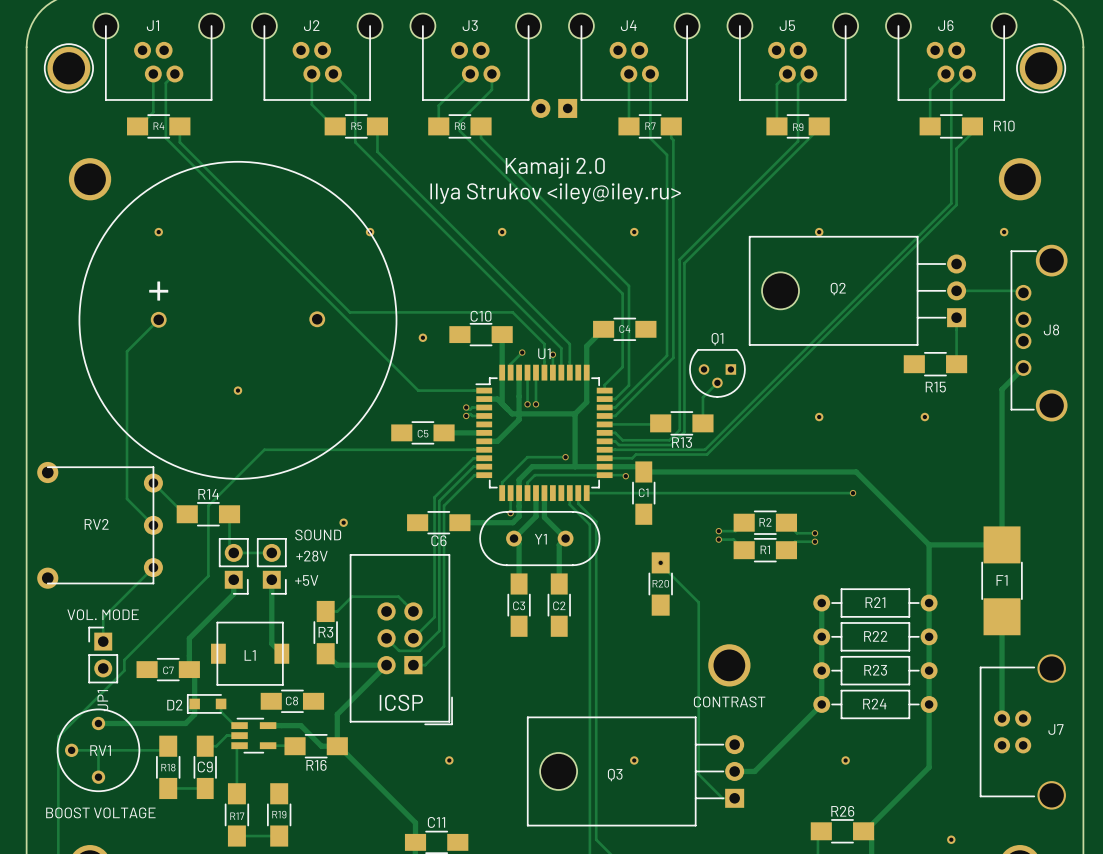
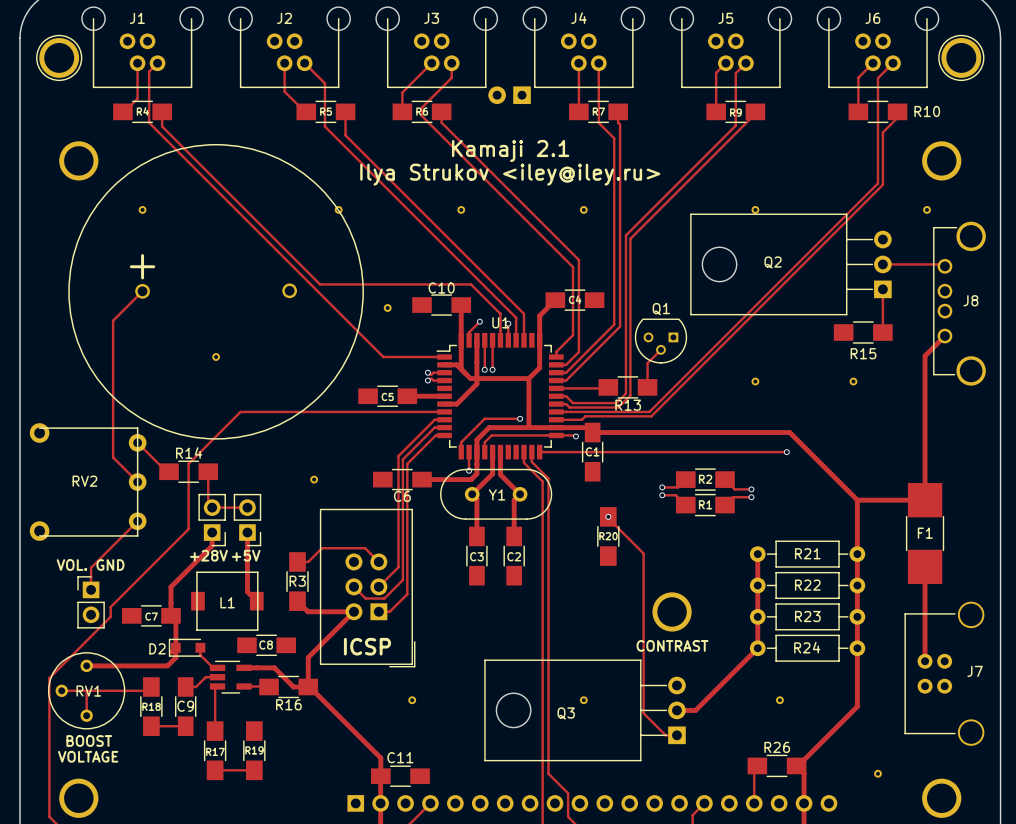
text: Kamaji 2.0 (555, 168) -> Kamaji 2.1 (510, 150)
text: SOUND (318, 534) -> none
text position: +28V (311, 556) -> +28V (208, 555)
text position: +5V (306, 580) -> +5V (246, 555)
text: VOL. MODE (103, 614) -> VOL. GND (90, 565)
JP1 name: JP1 (102, 700) -> none
text: none -> BOOST (89, 740)
text: BOOST VOLTAGE (100, 812) -> VOLTAGE (88, 756)

